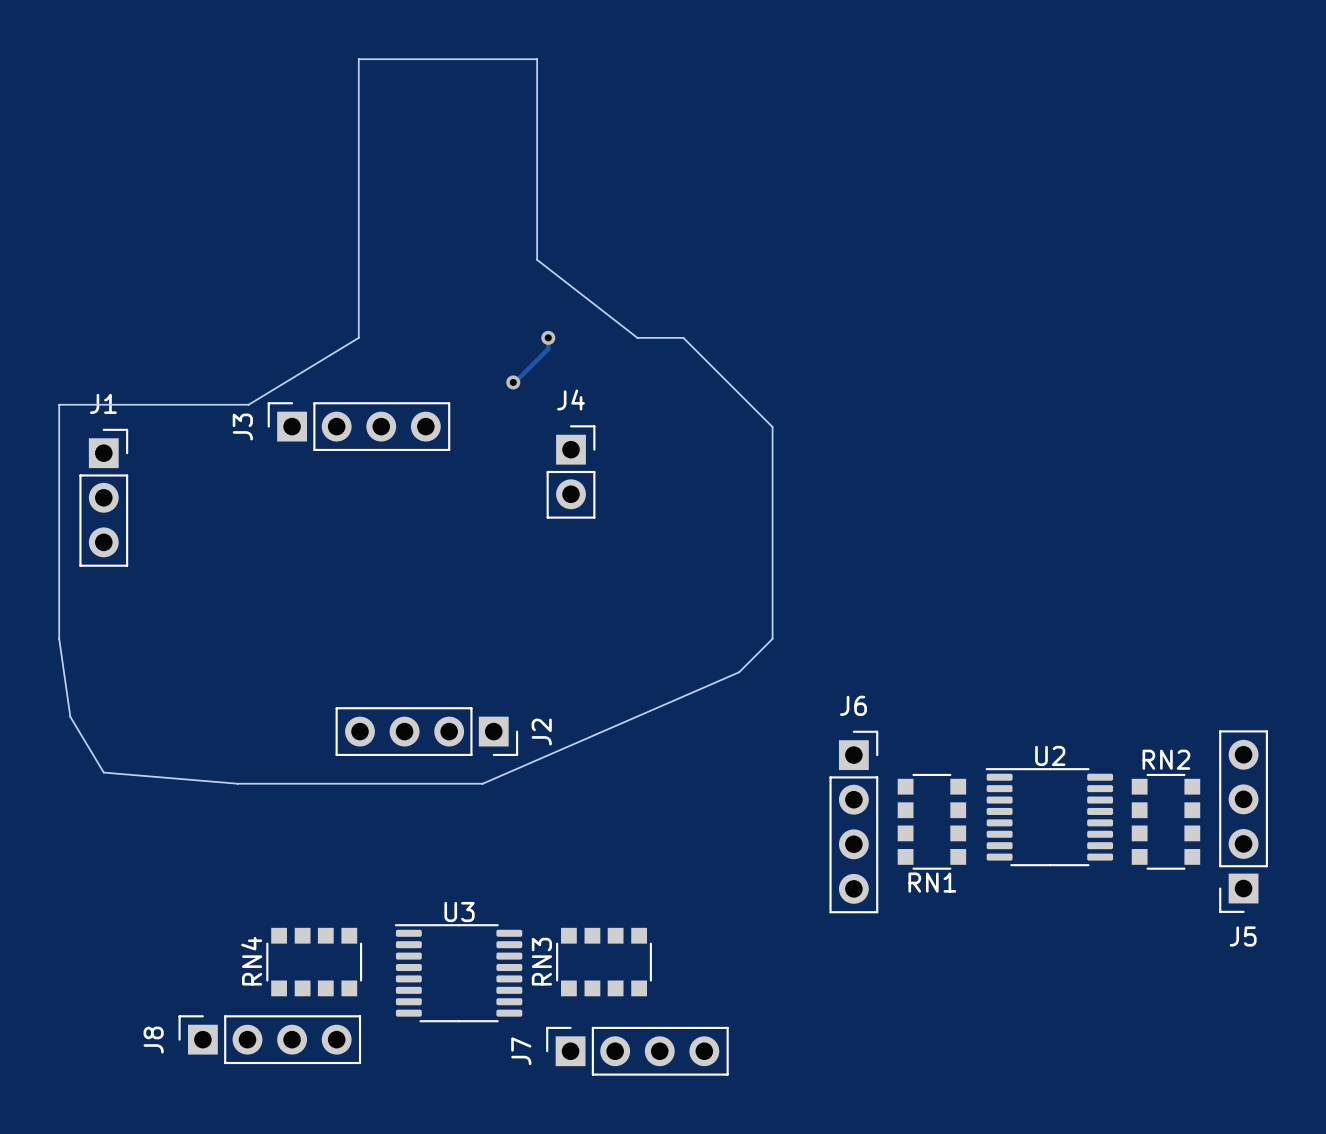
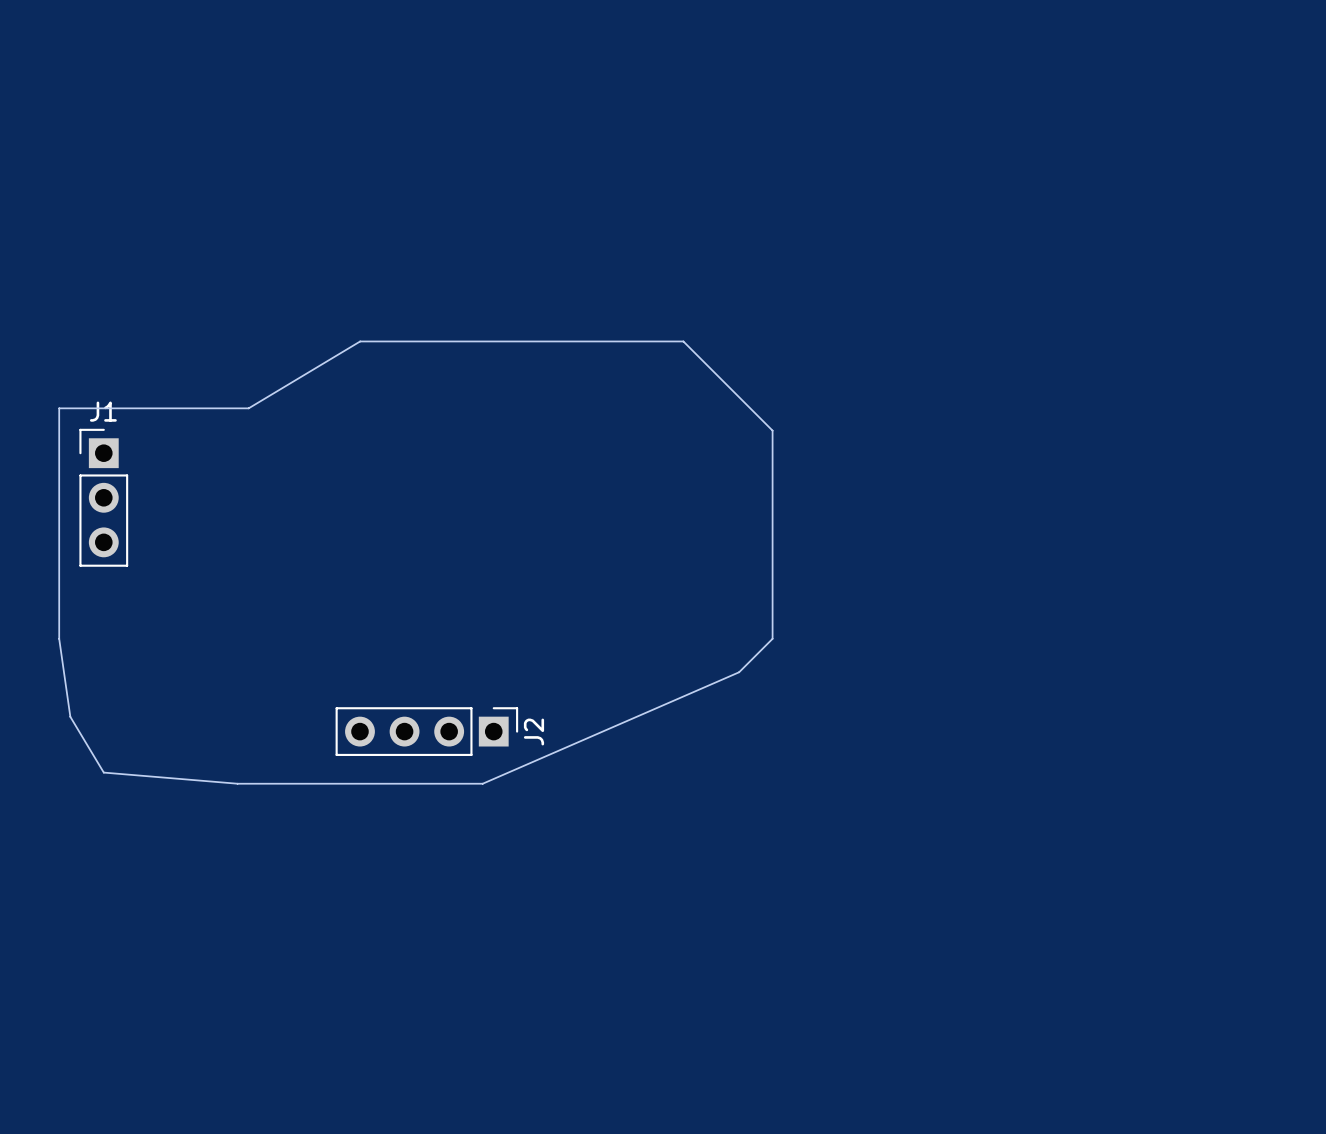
track: (548, 337) (548, 349) (513, 382) -> none
via: (548, 337) -> none
via: (513, 382) -> none
board edge: (59, 408) (59, 404) (248, 404) (358, 337) (358, 59) (537, 59) (537, 259) (637, 337) (683, 337) (772, 427) (772, 430) -> (59, 408) (248, 408) (360, 341) (683, 341) (772, 430)
J3: (358, 426) -> none
J1 footprint: [79, 428, 129, 567] -> [79, 428, 129, 567]
J4: (571, 471) -> none
J2 footprint: [335, 707, 519, 756] -> [335, 707, 519, 756]
U2: (1049, 817) -> none
J6: (853, 821) -> none
RN1: (931, 821) -> none
RN2: (1165, 821) -> none
J5: (1243, 821) -> none
RN4: (314, 962) -> none
RN3: (604, 962) -> none
U3: (458, 973) -> none
J8: (269, 1039) -> none
J7: (637, 1051) -> none

